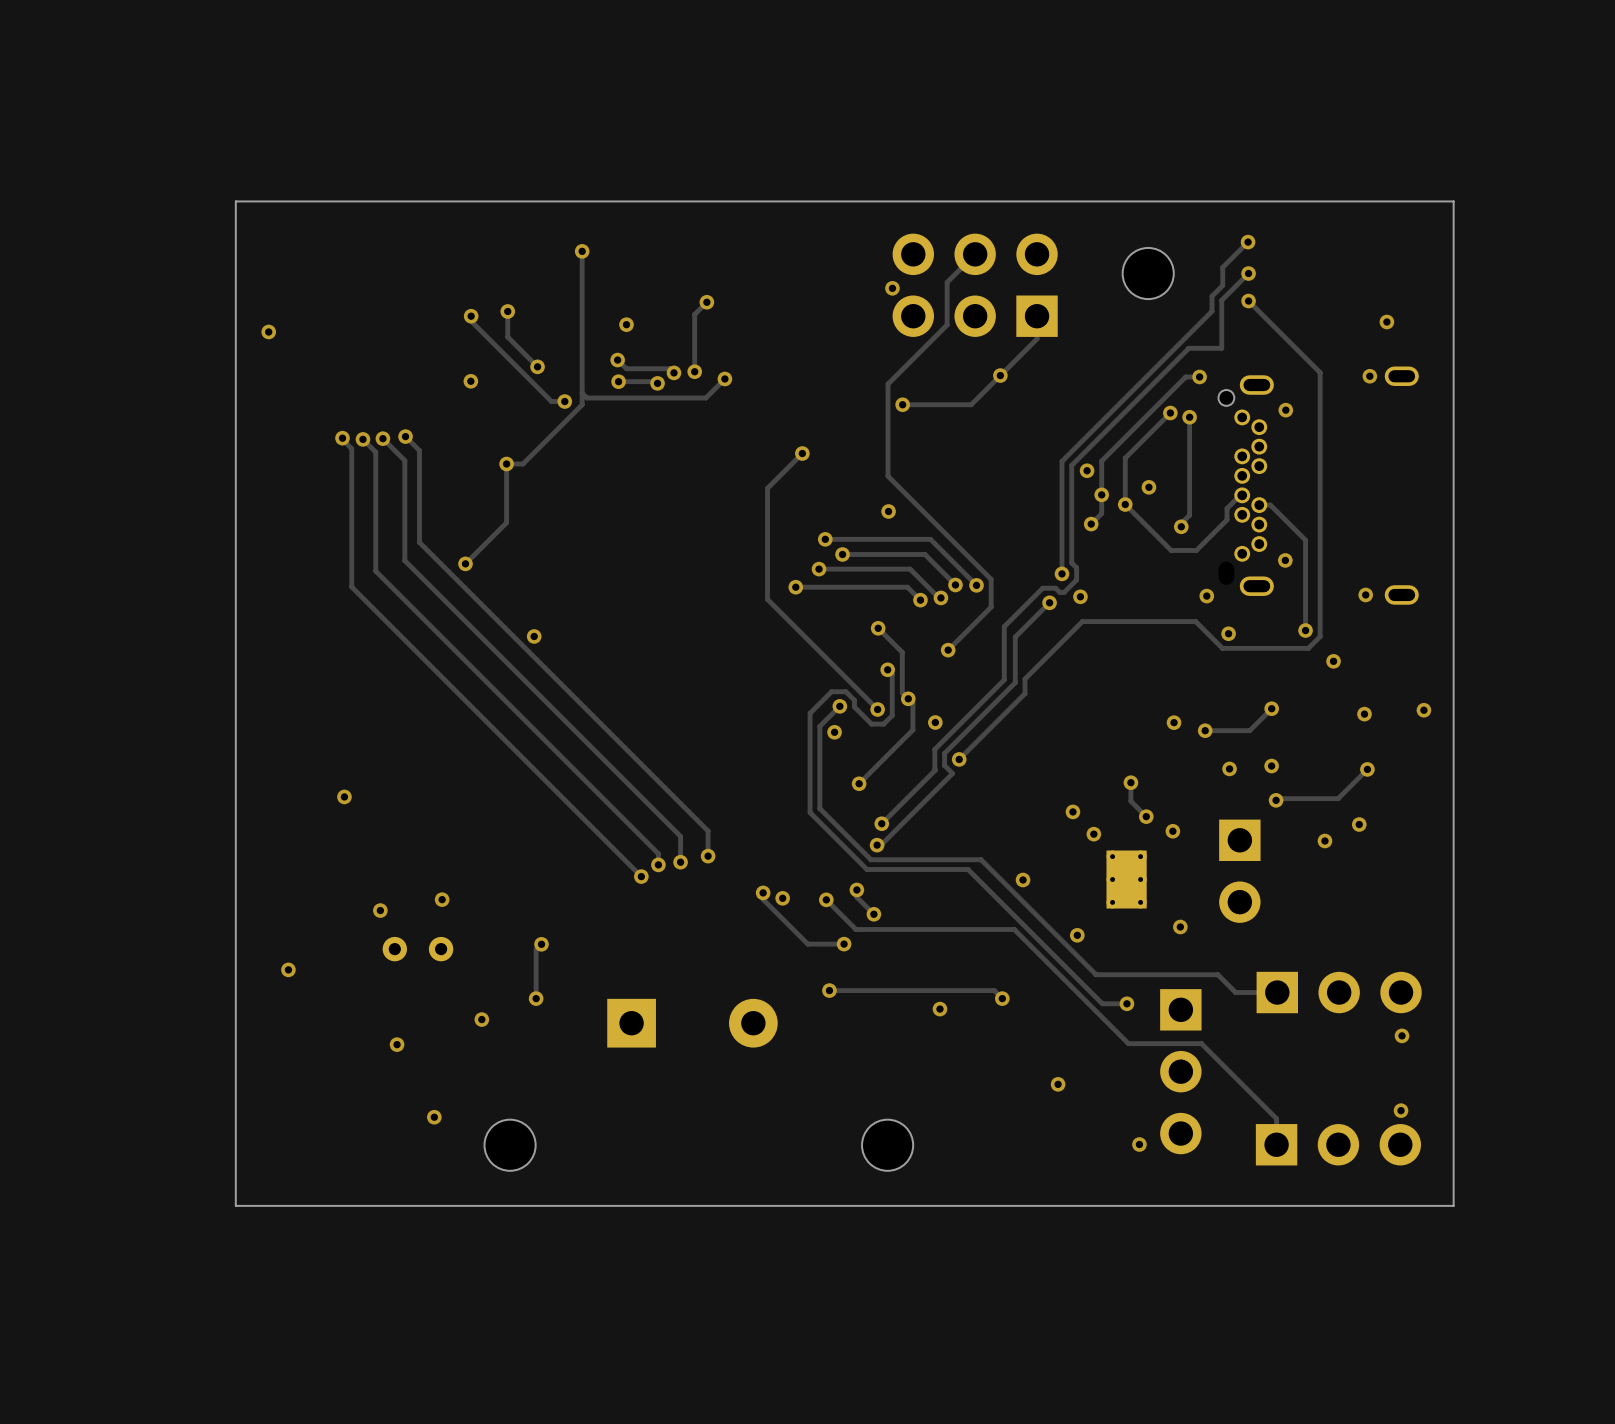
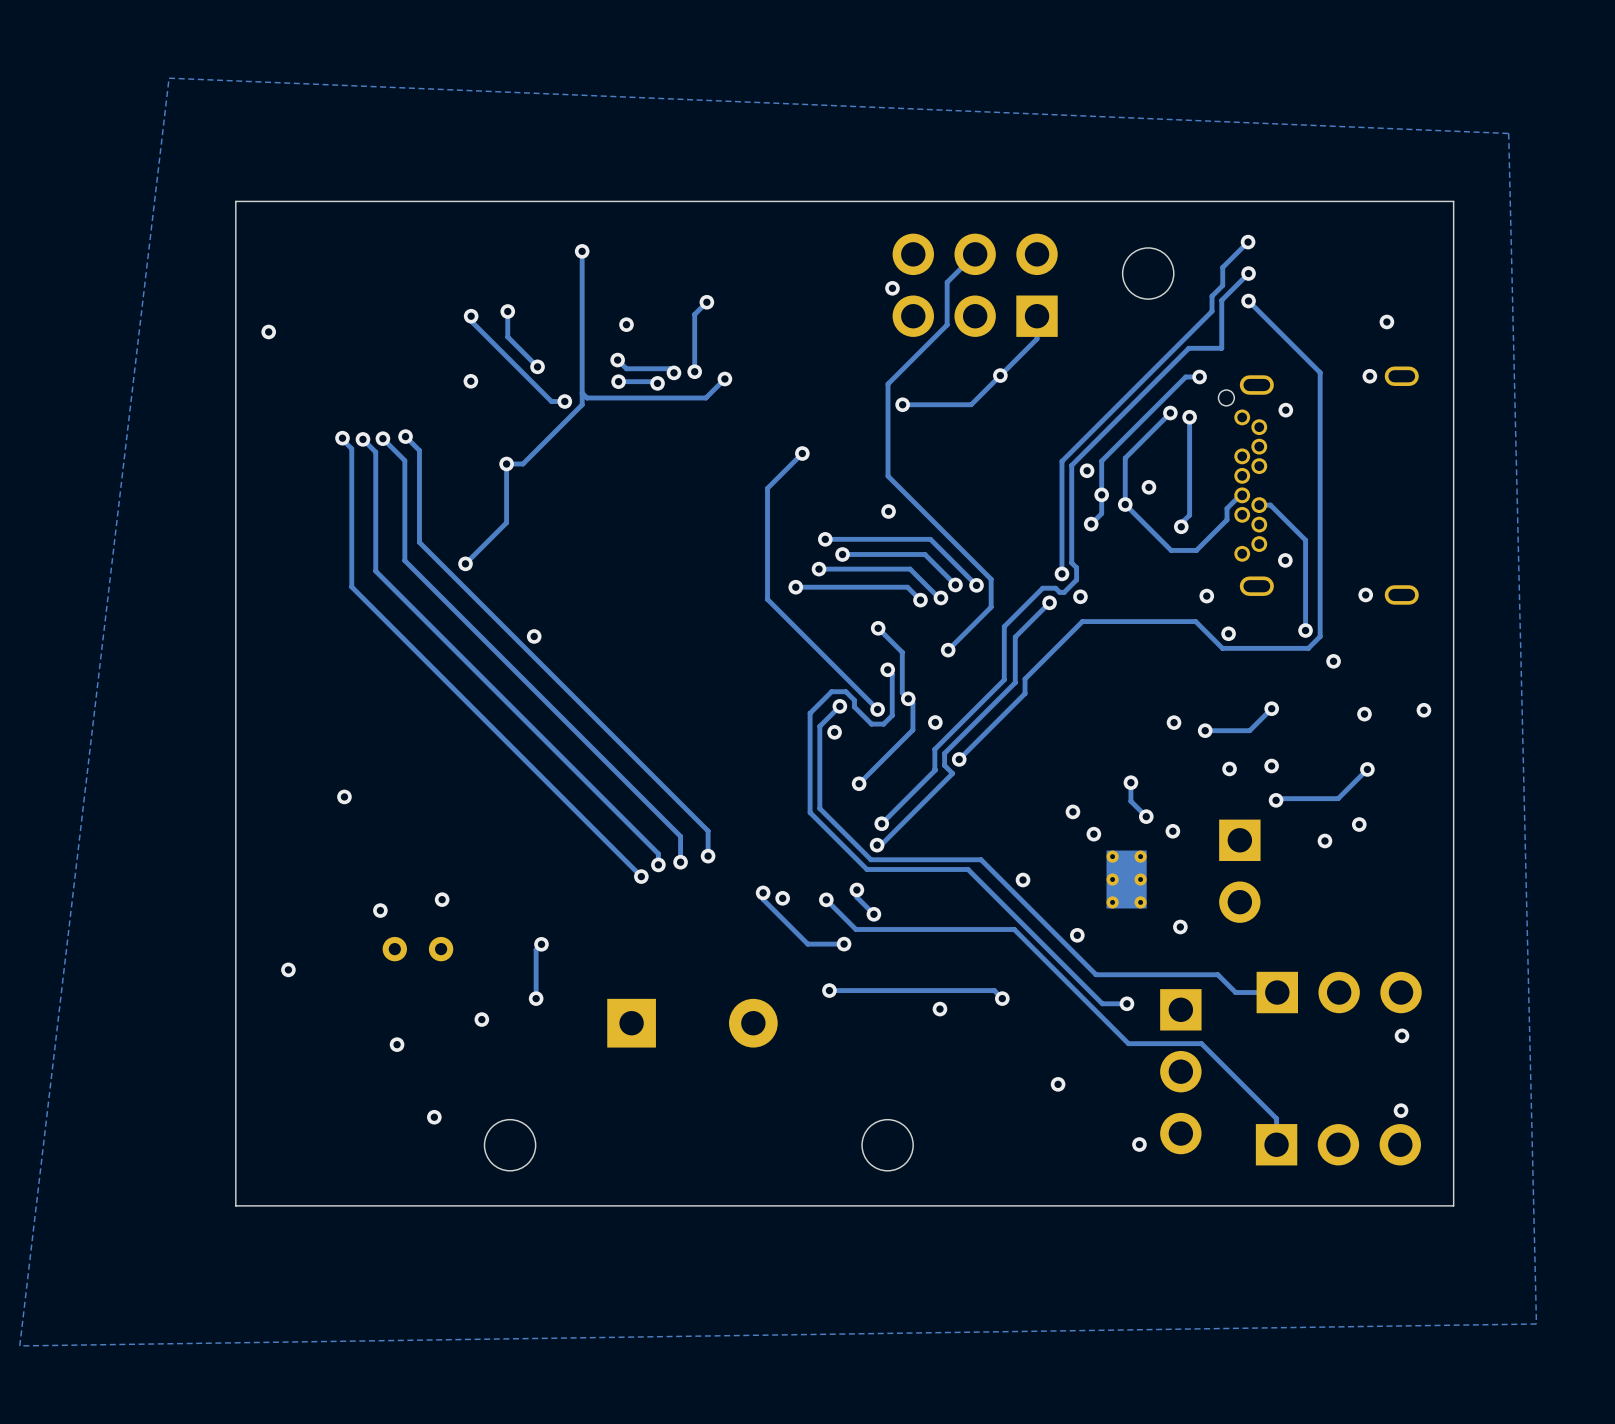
zone outline: none -> (169, 78) (19, 1345) (1536, 1324) (1508, 133) (169, 78)

